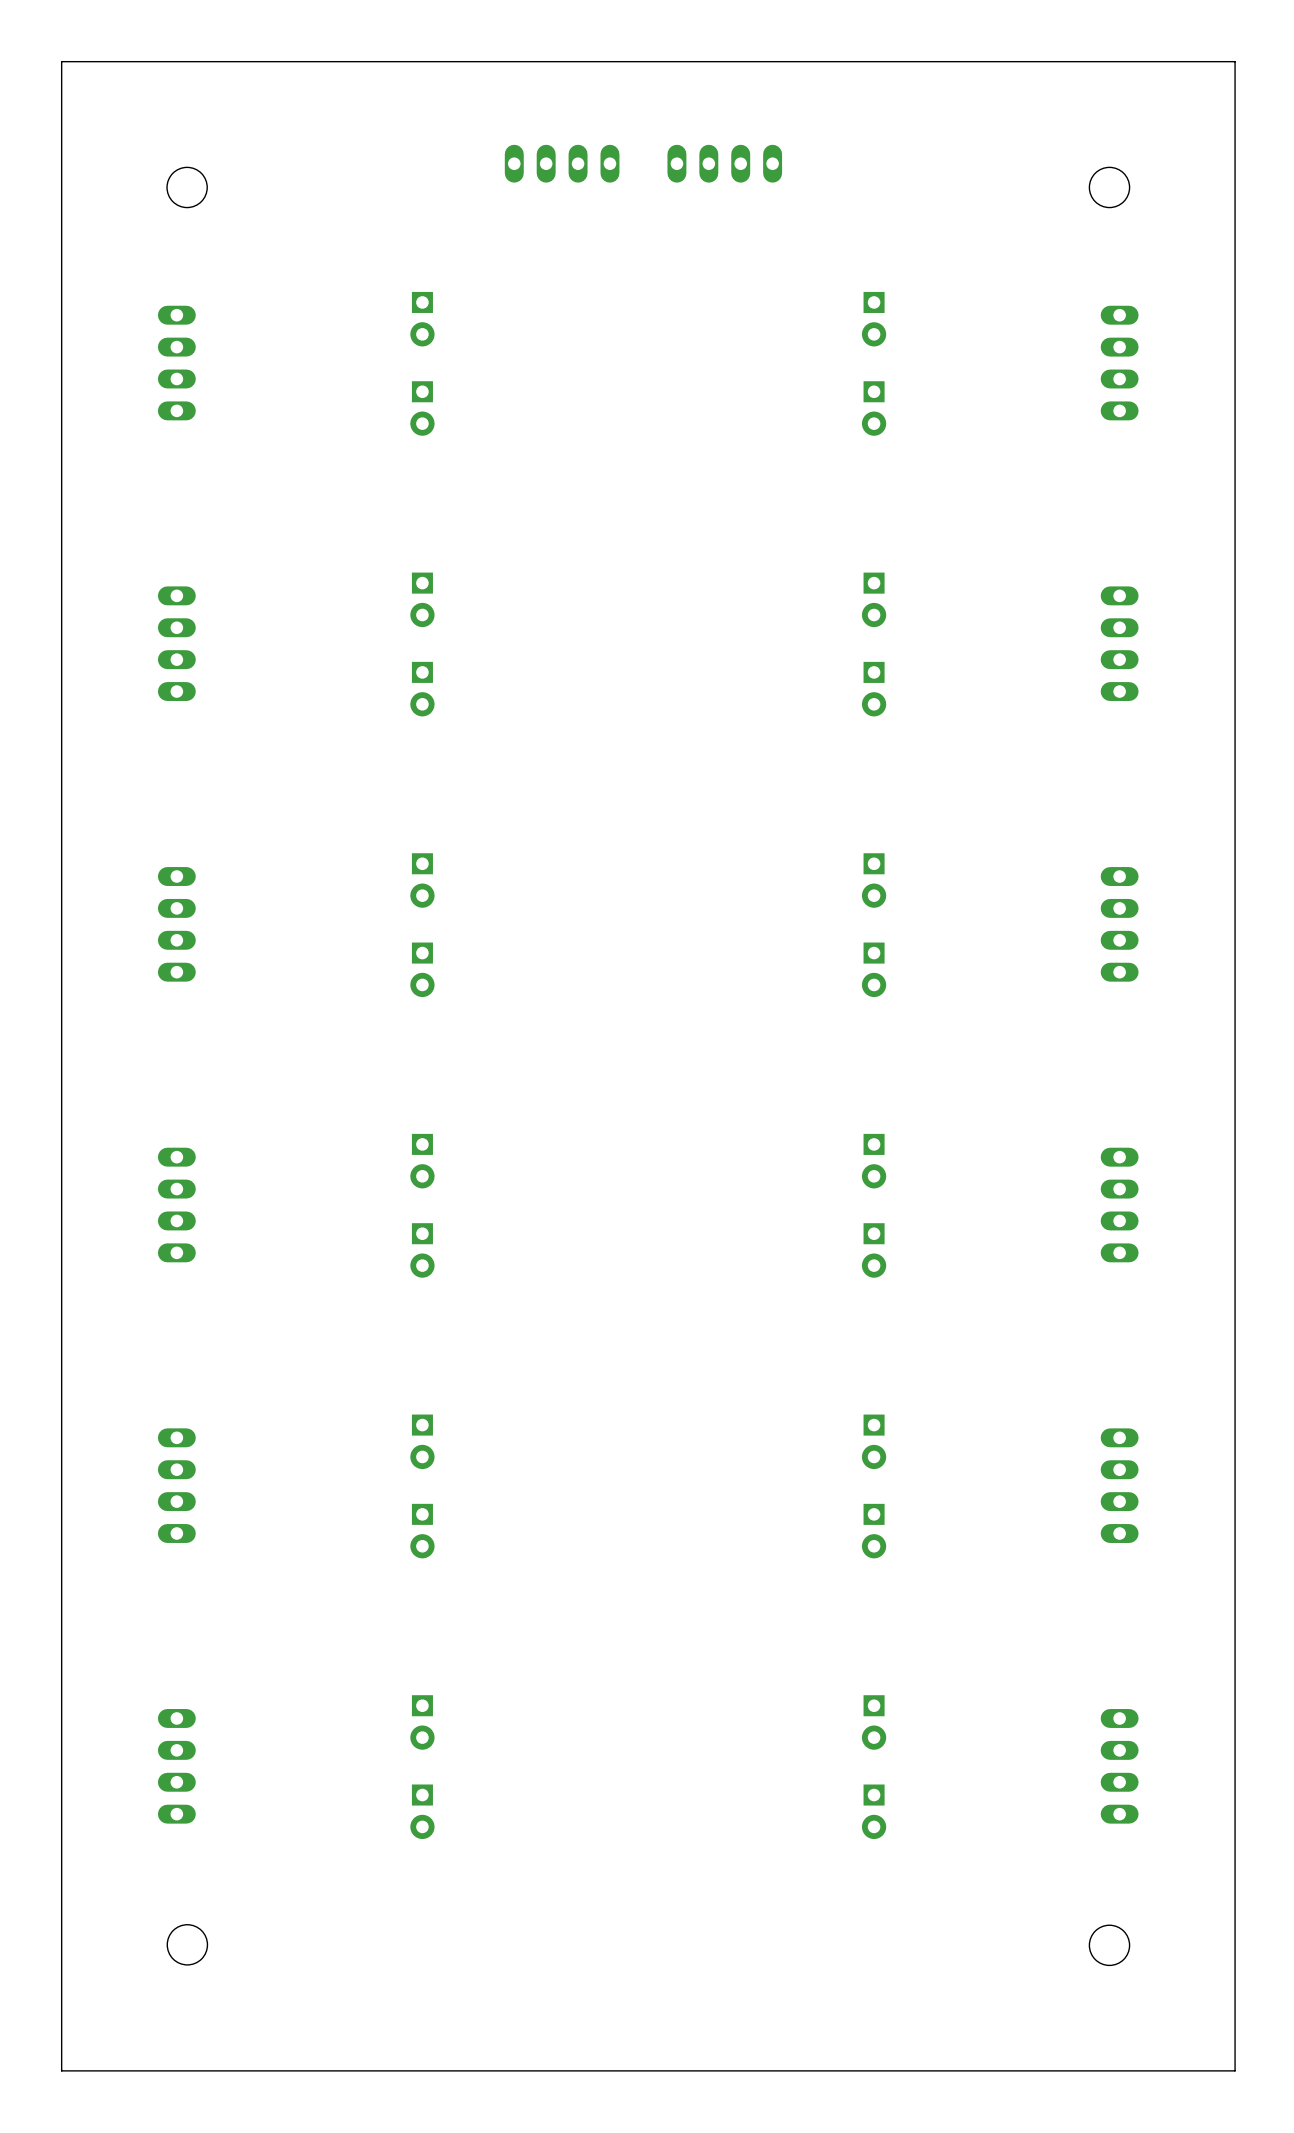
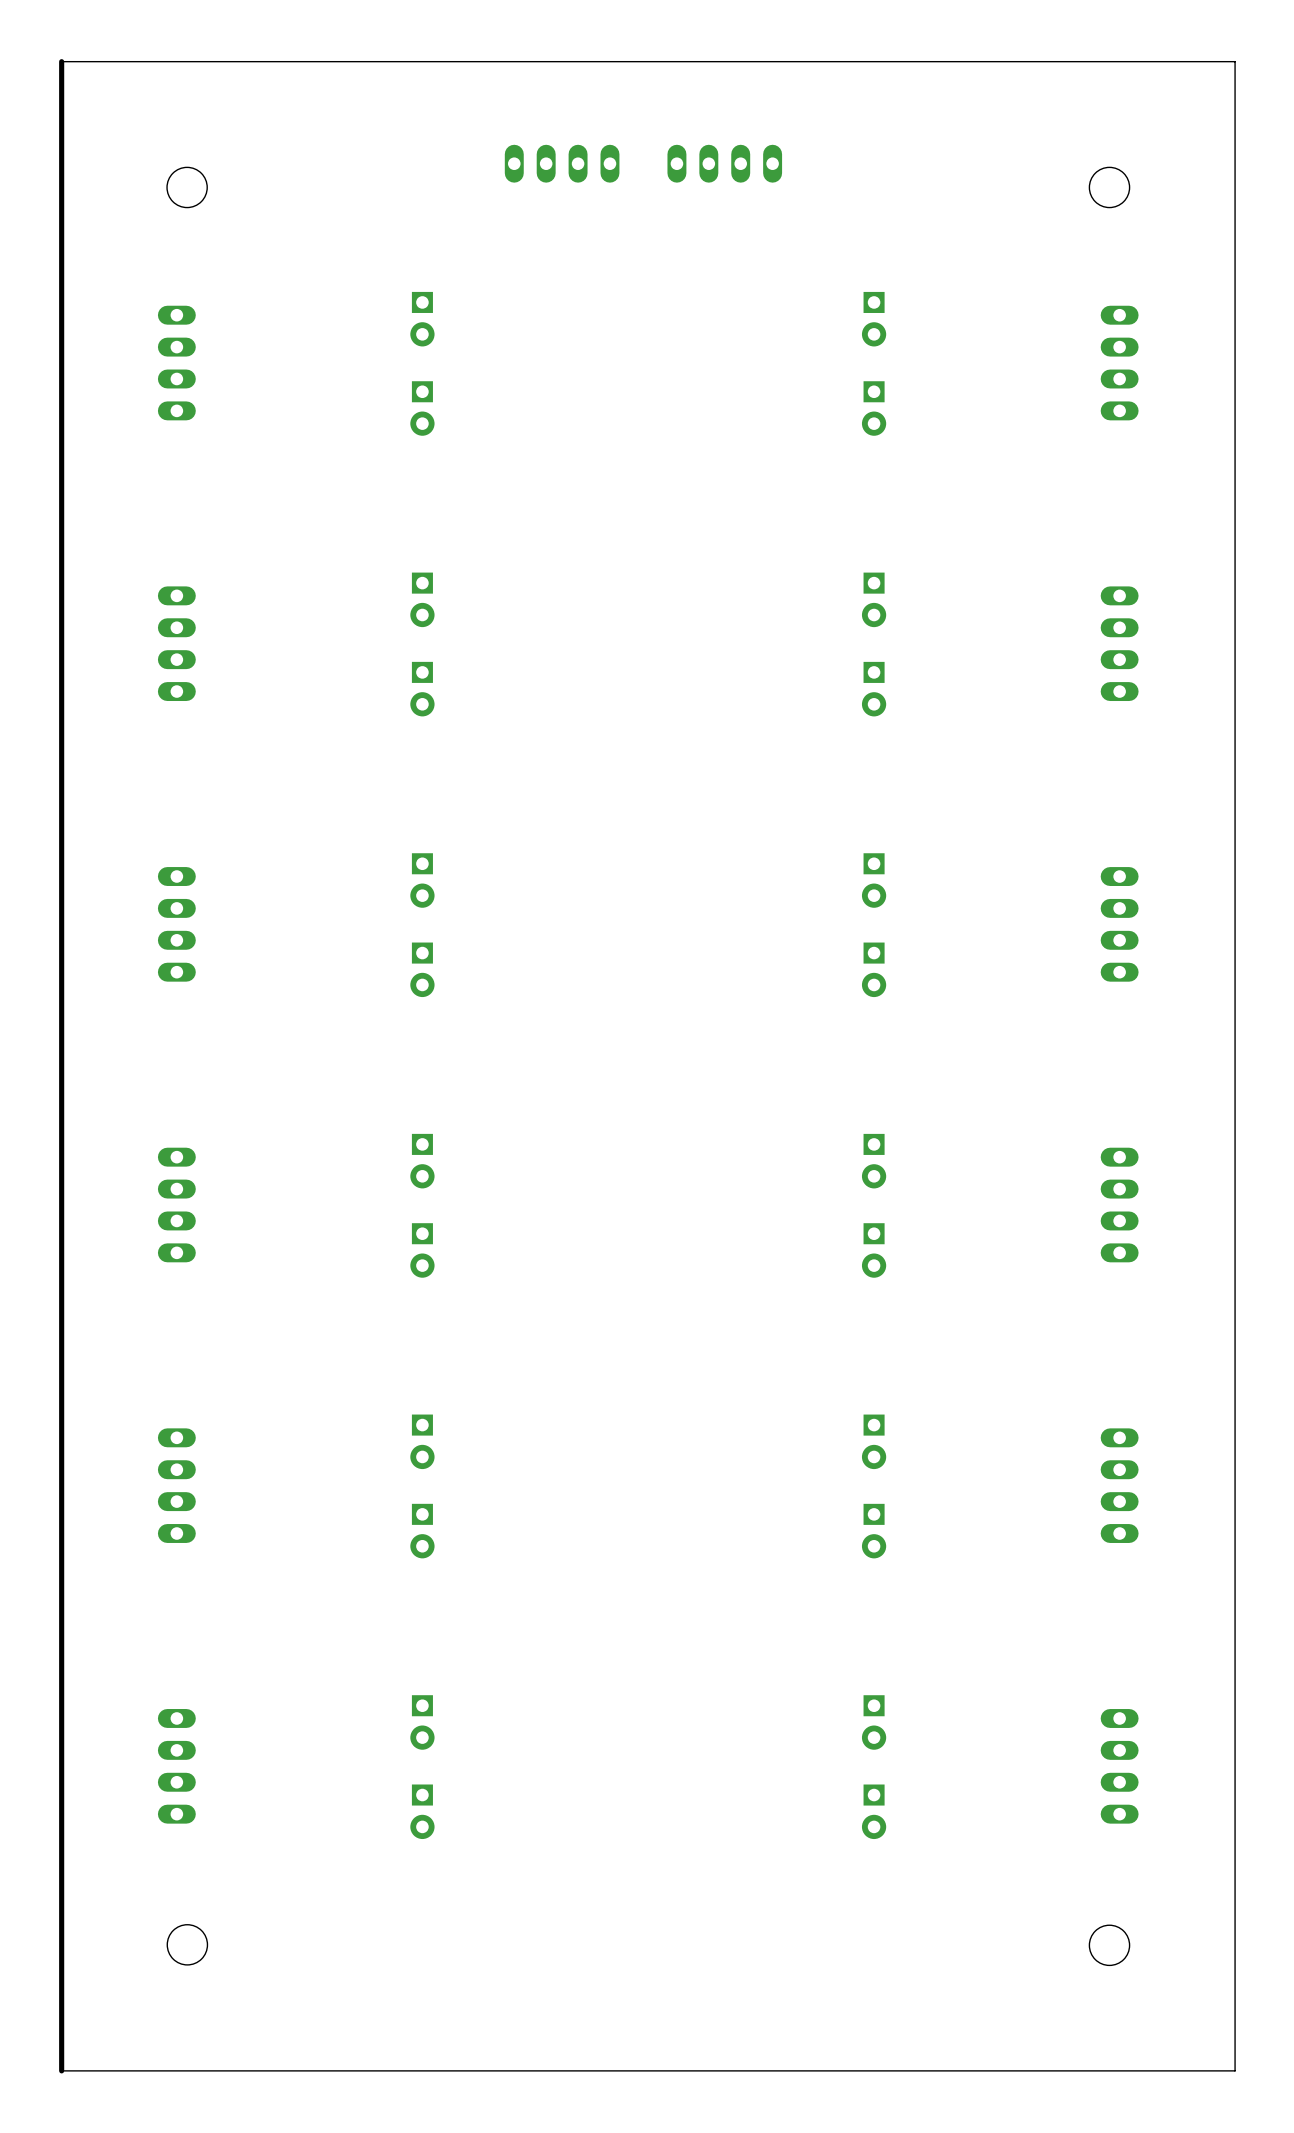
board edge width: thin (61, 61) (61, 2070) -> thick (61, 61) (61, 2070)

